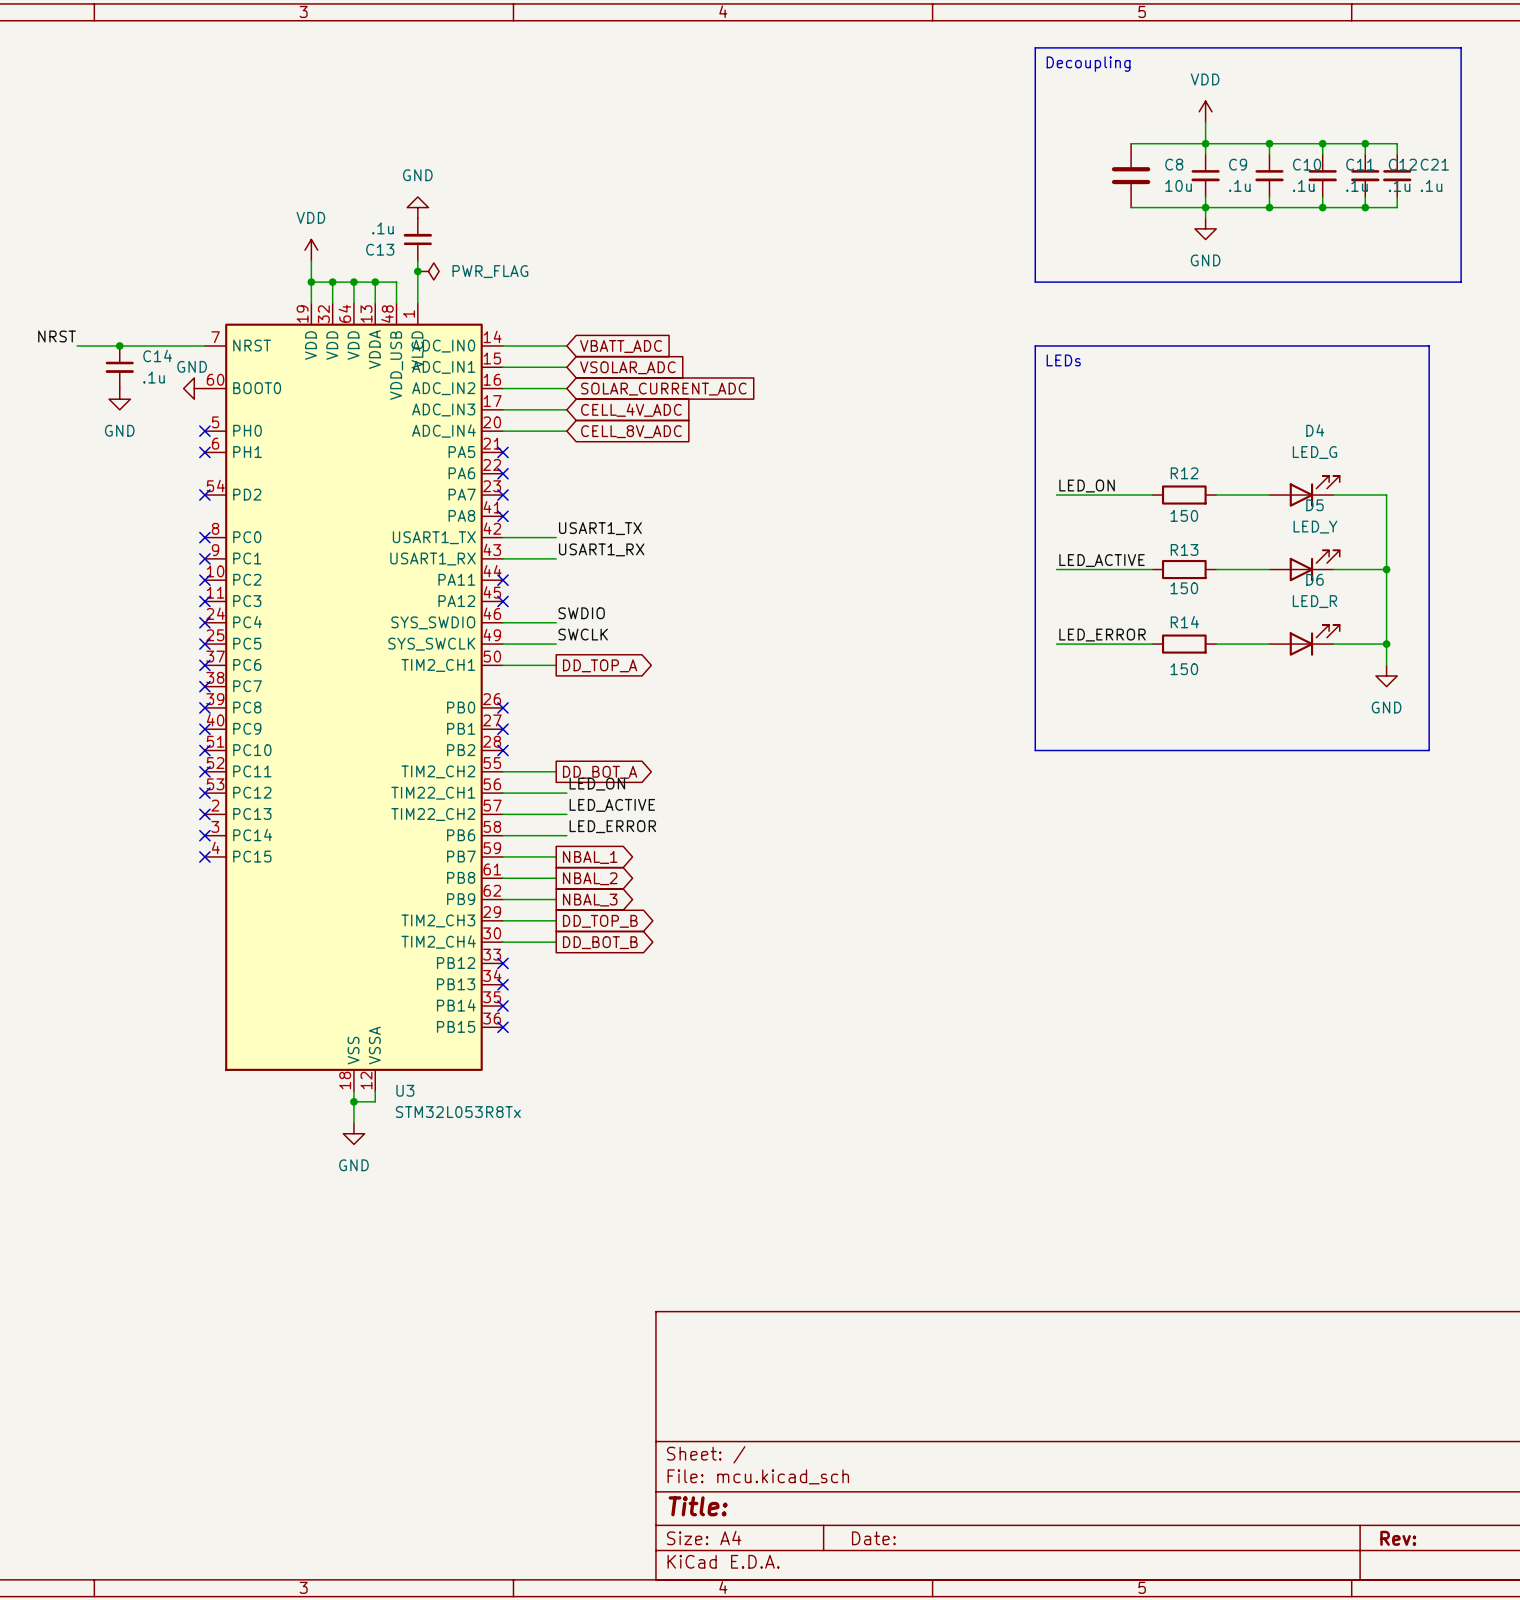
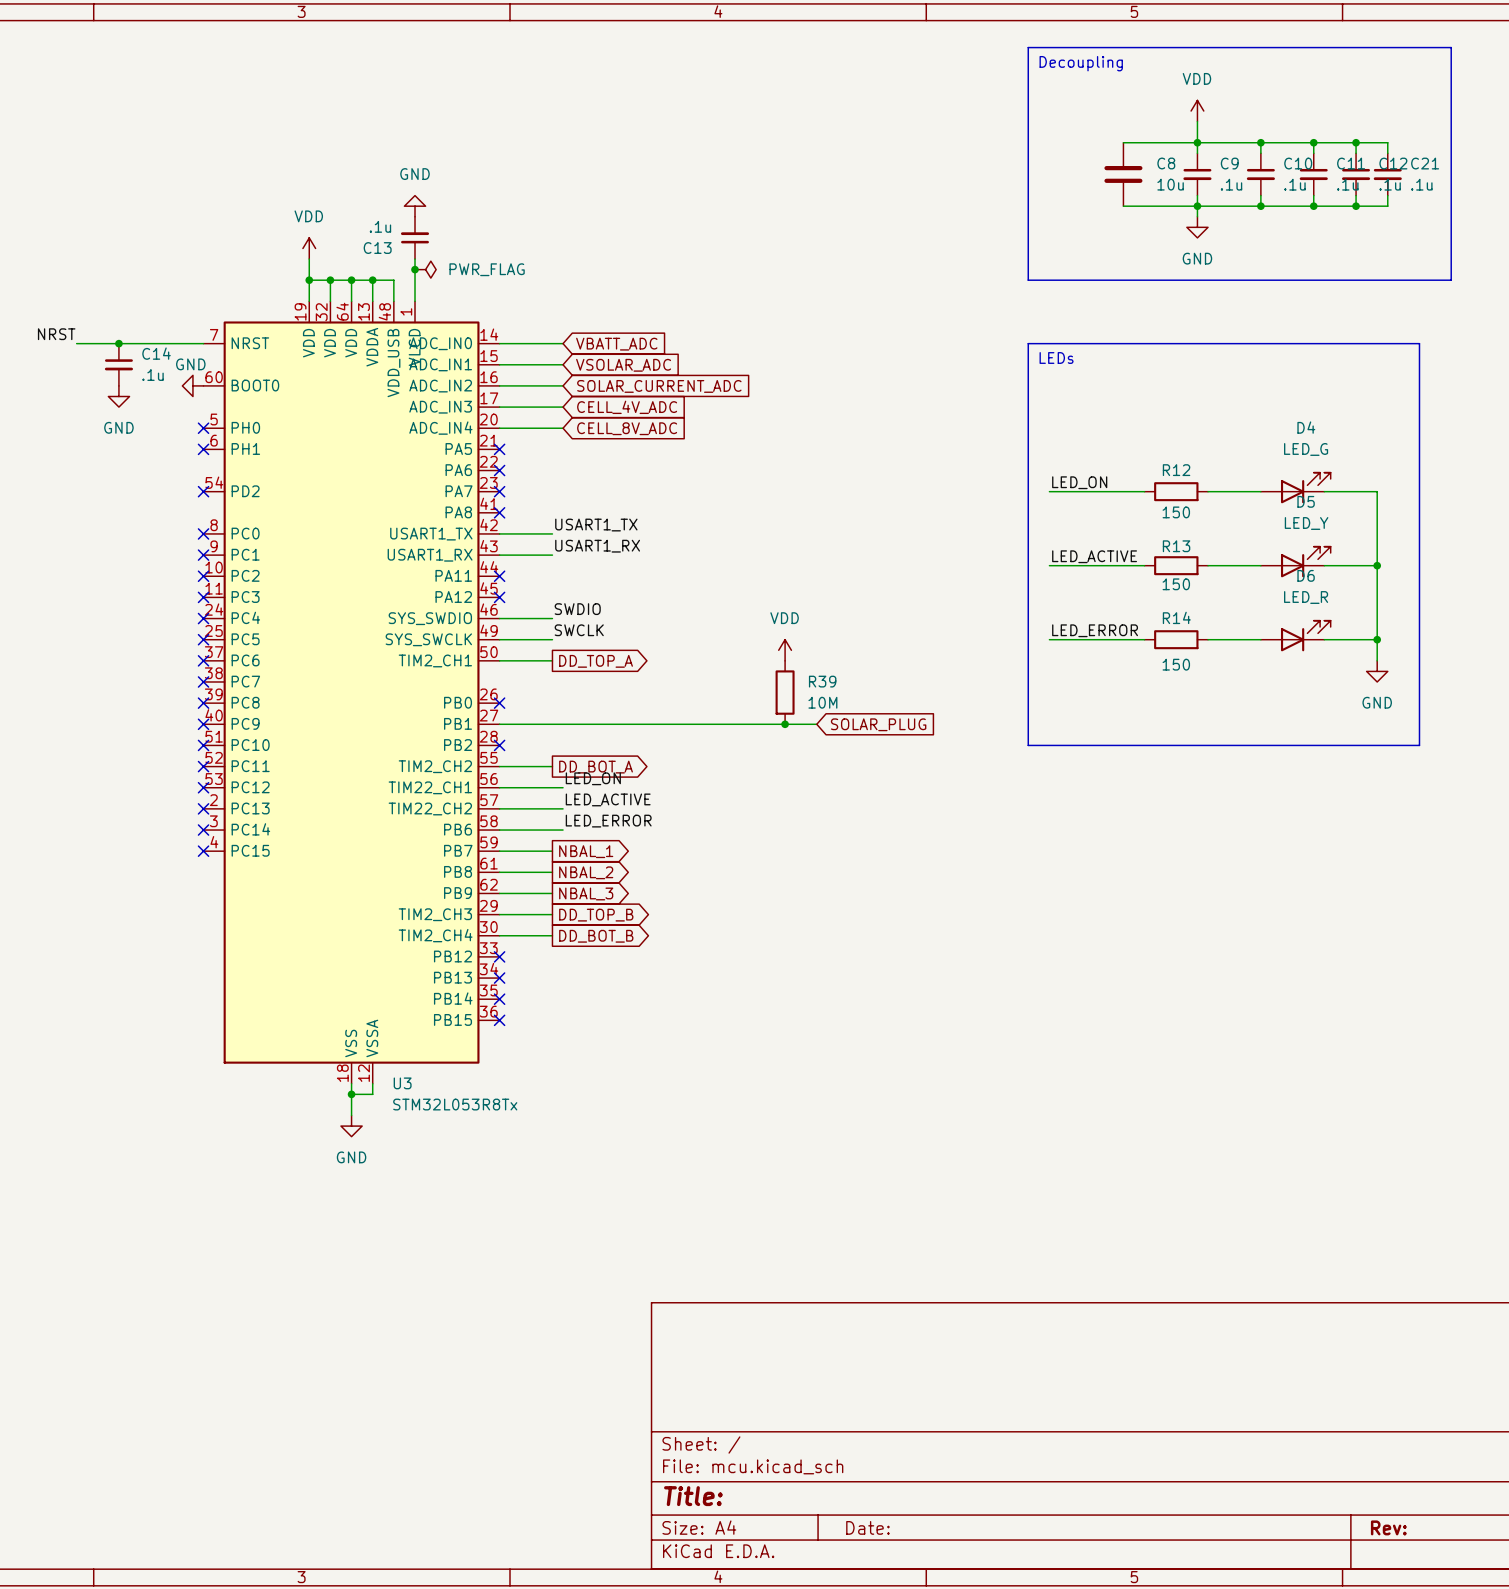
power symbol: none -> VDD (785, 650)
R39: none -> 10M (785, 692)
wire: none -> (499, 724) (816, 724)
no-connect mark: (502, 729) -> none
junction: none -> (785, 724)
global label: none -> SOLAR_PLUG (878, 724)

